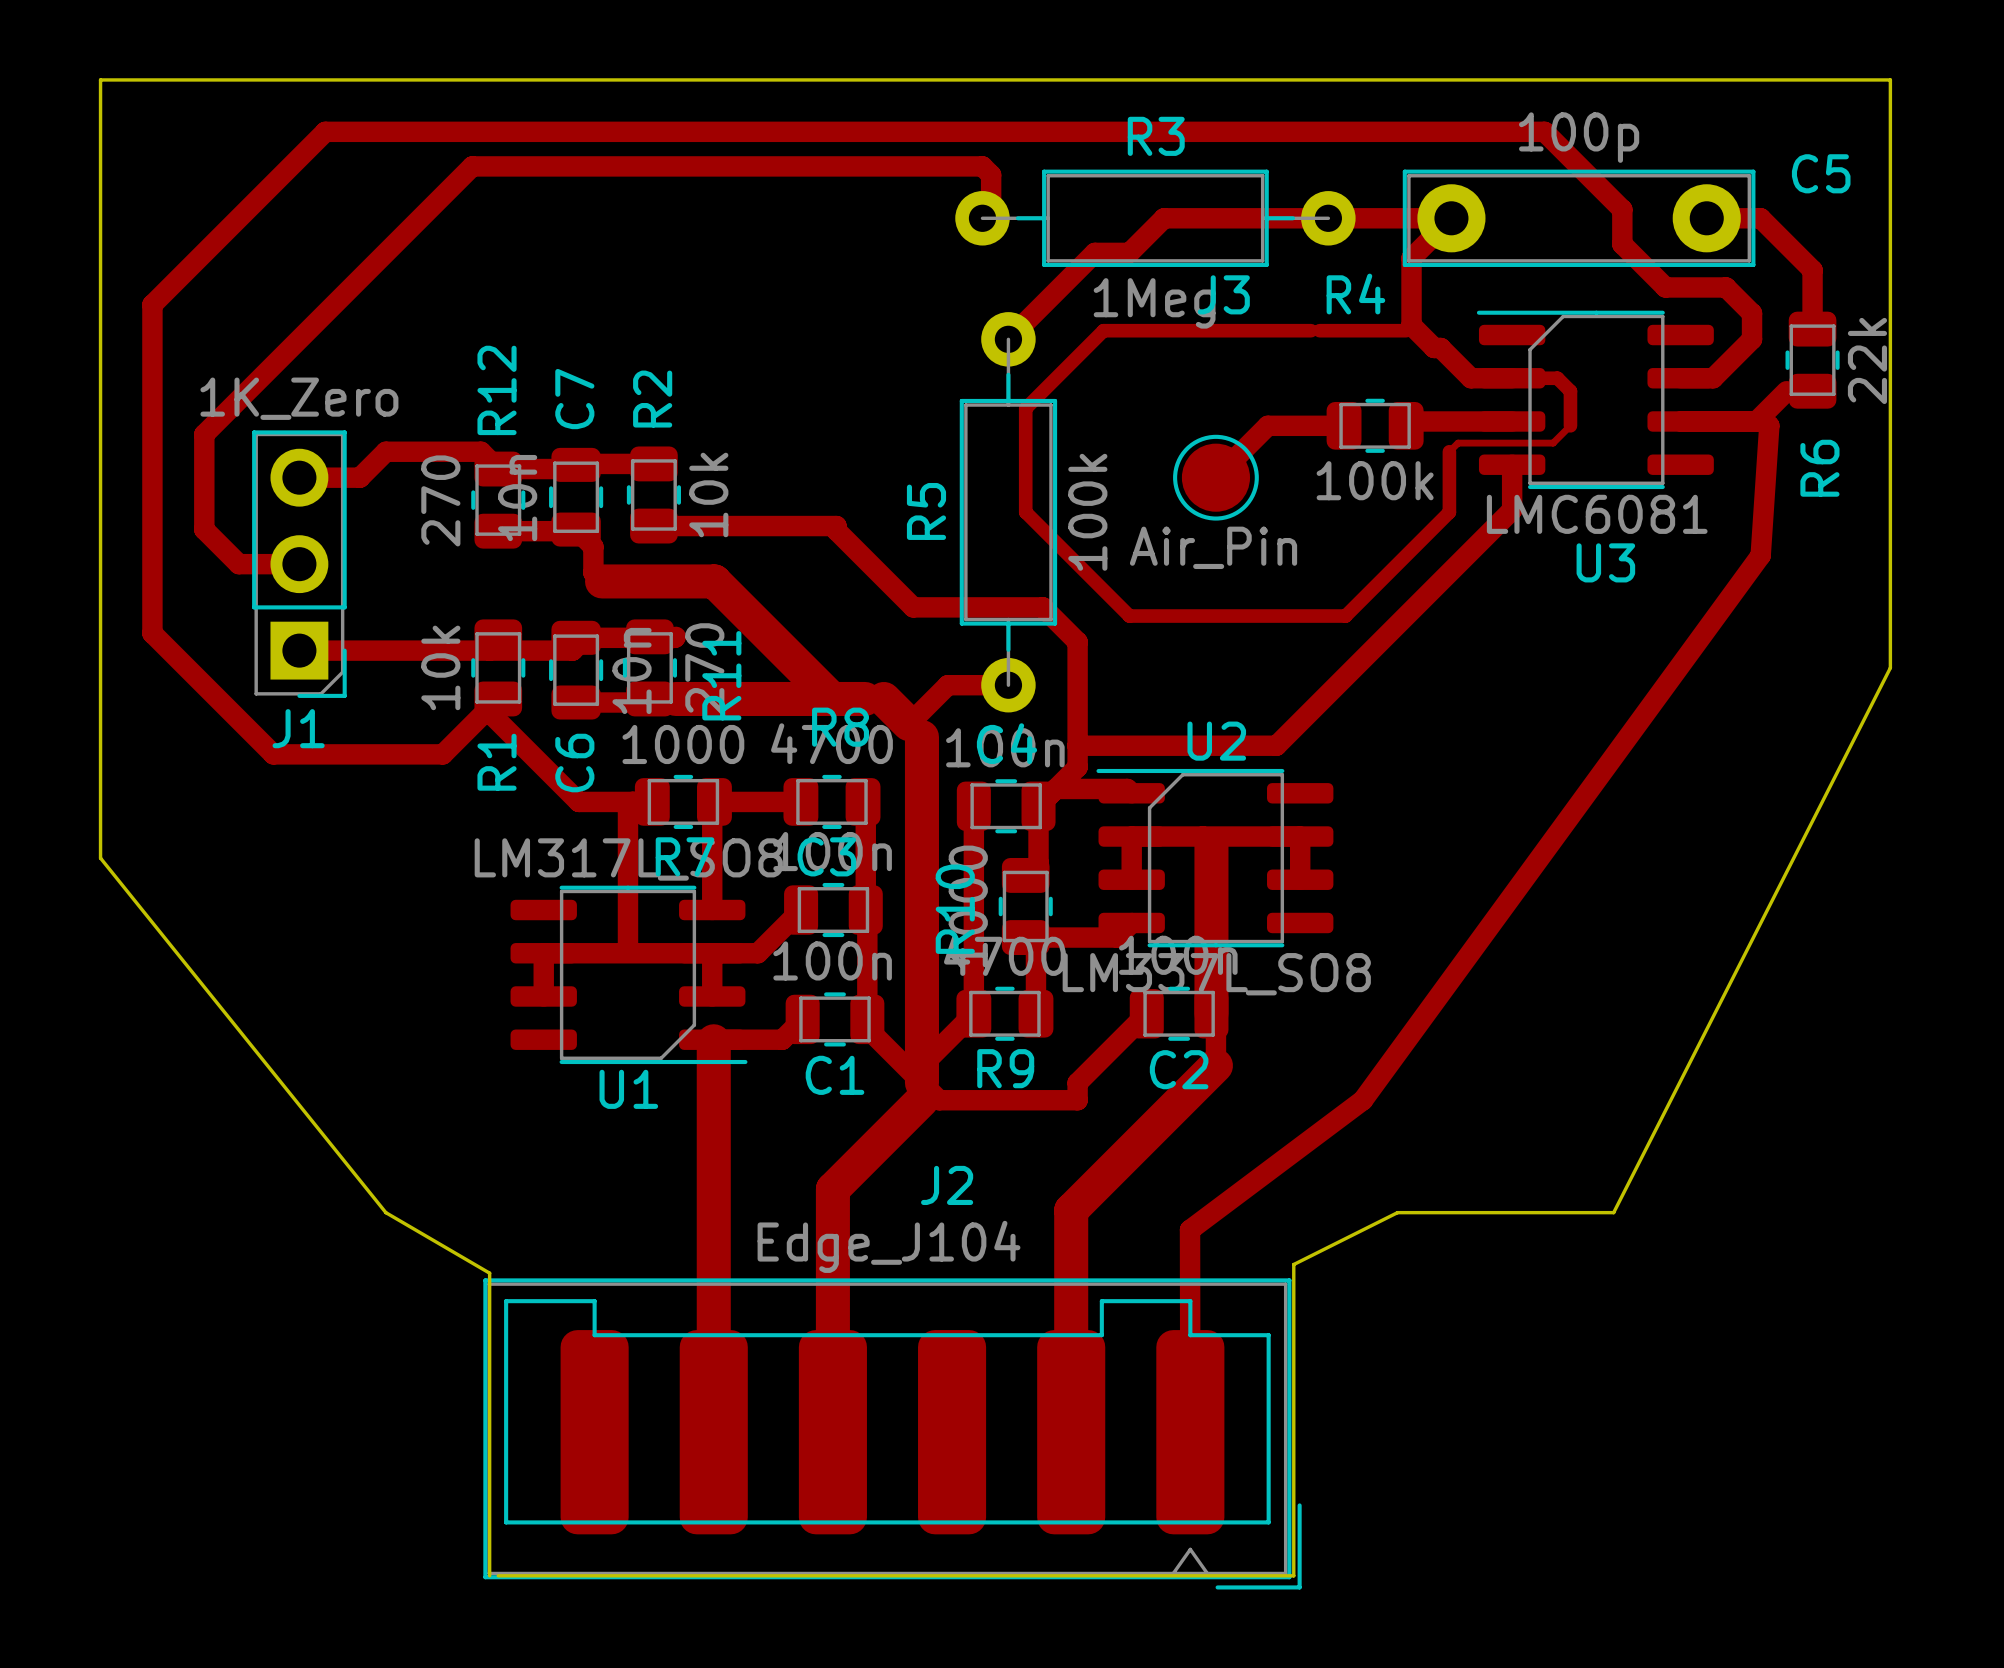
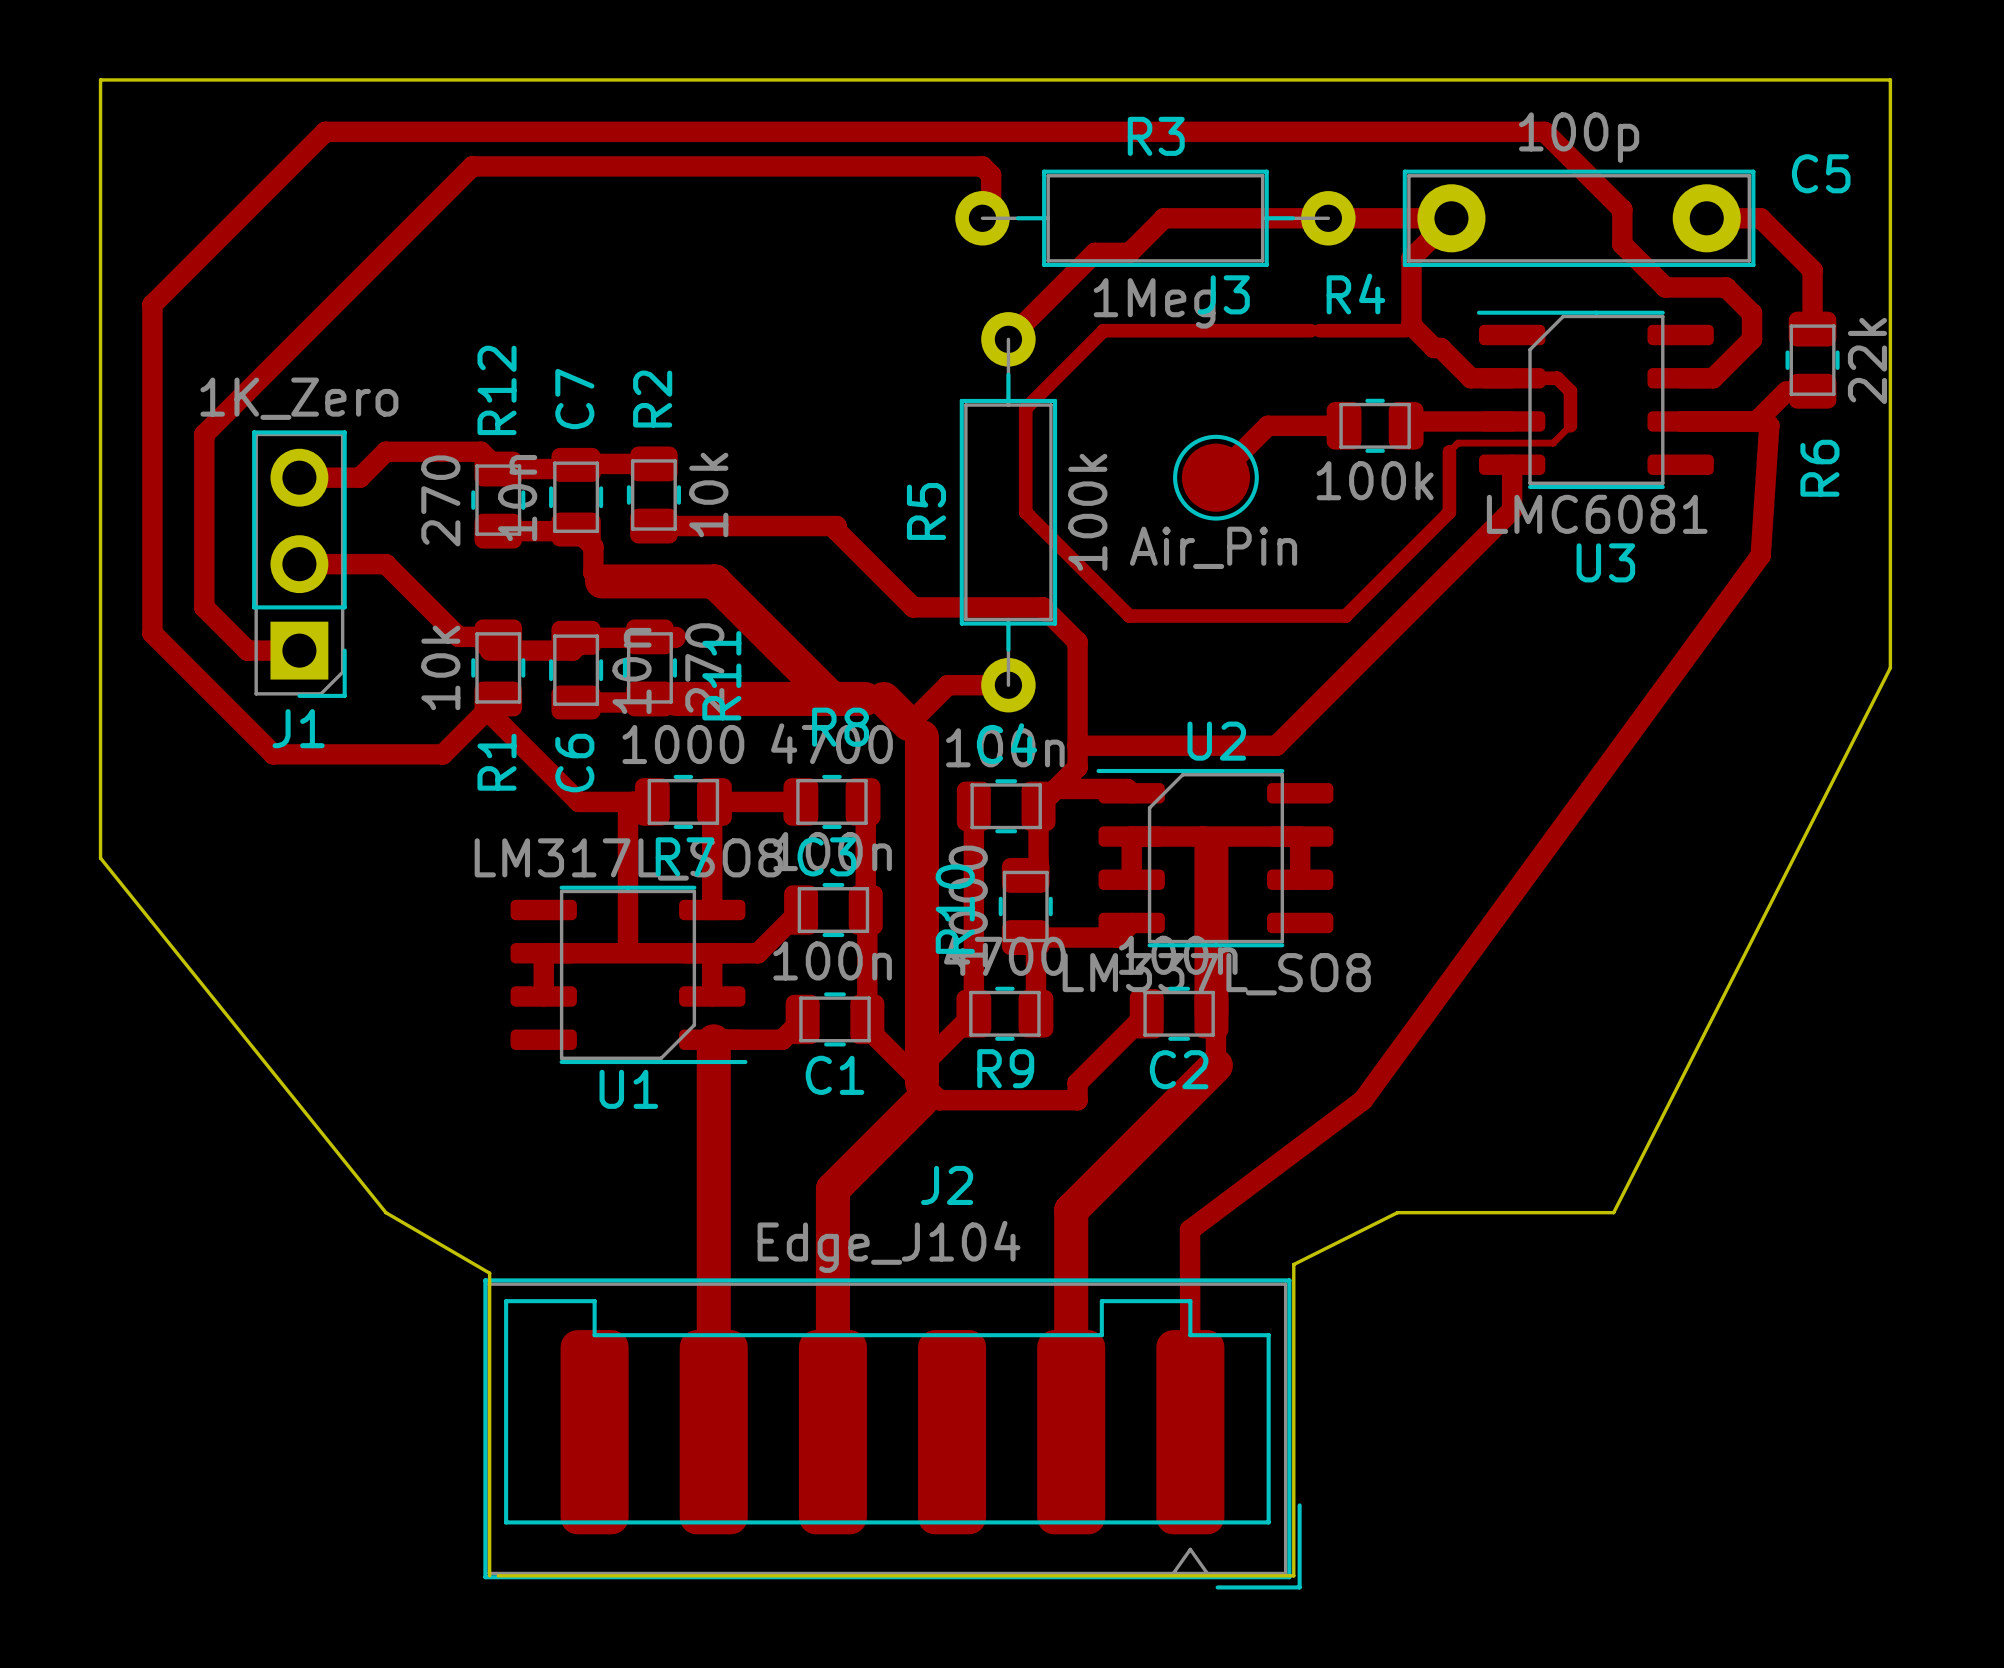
track: (204, 529) (238, 564) (299, 564) -> (204, 529) (204, 607) (247, 650) (299, 650)
track: none -> (299, 564) (385, 564) (458, 636) (498, 636)
track: (299, 650) (489, 650) -> none

